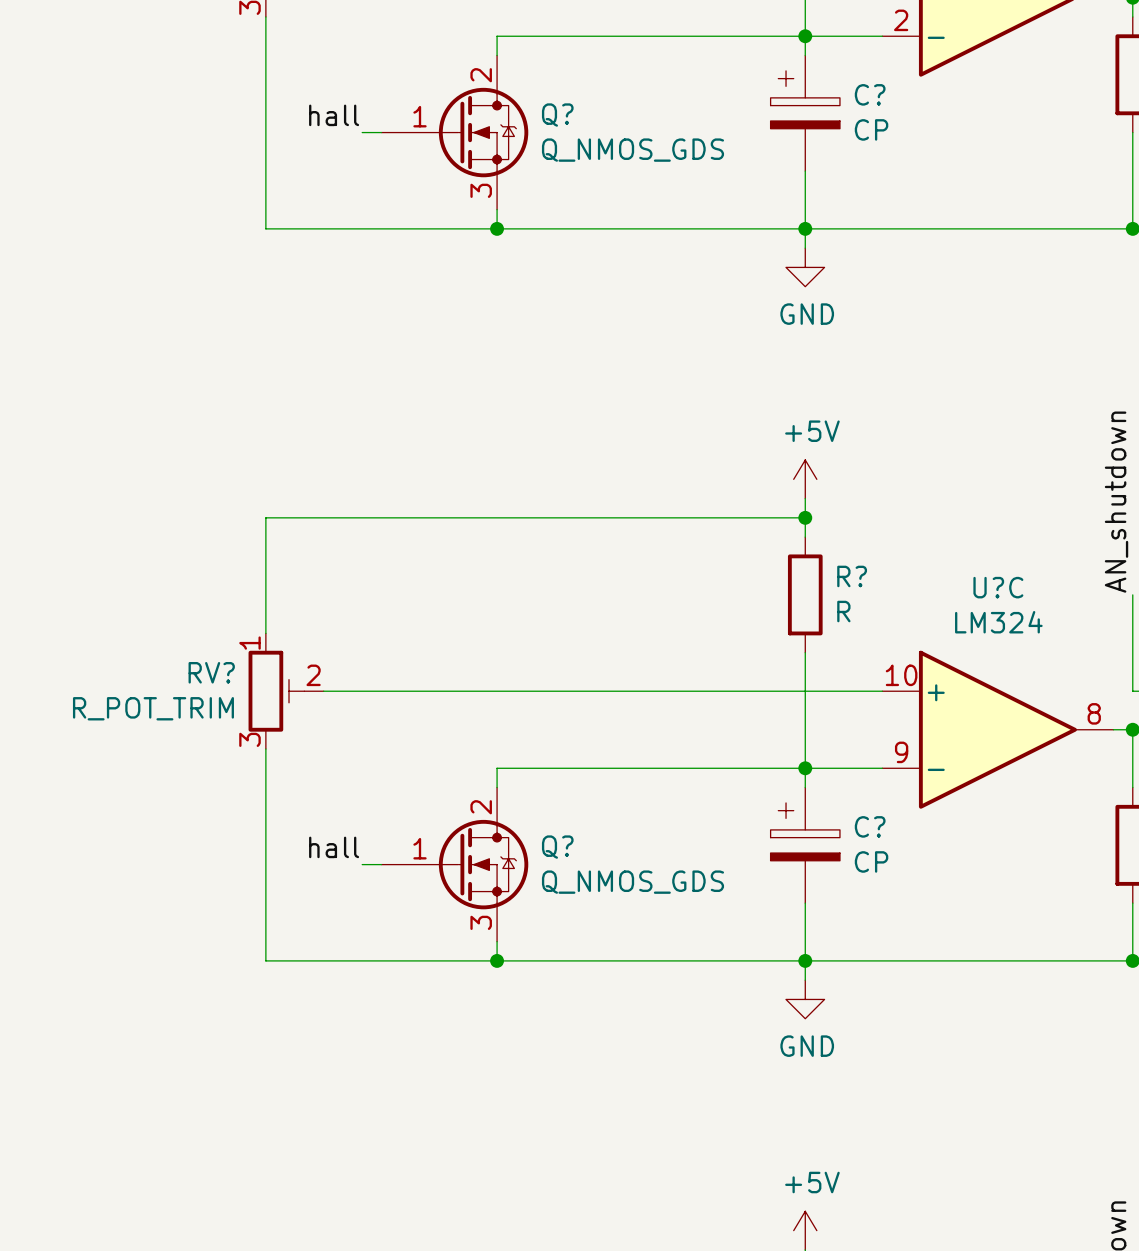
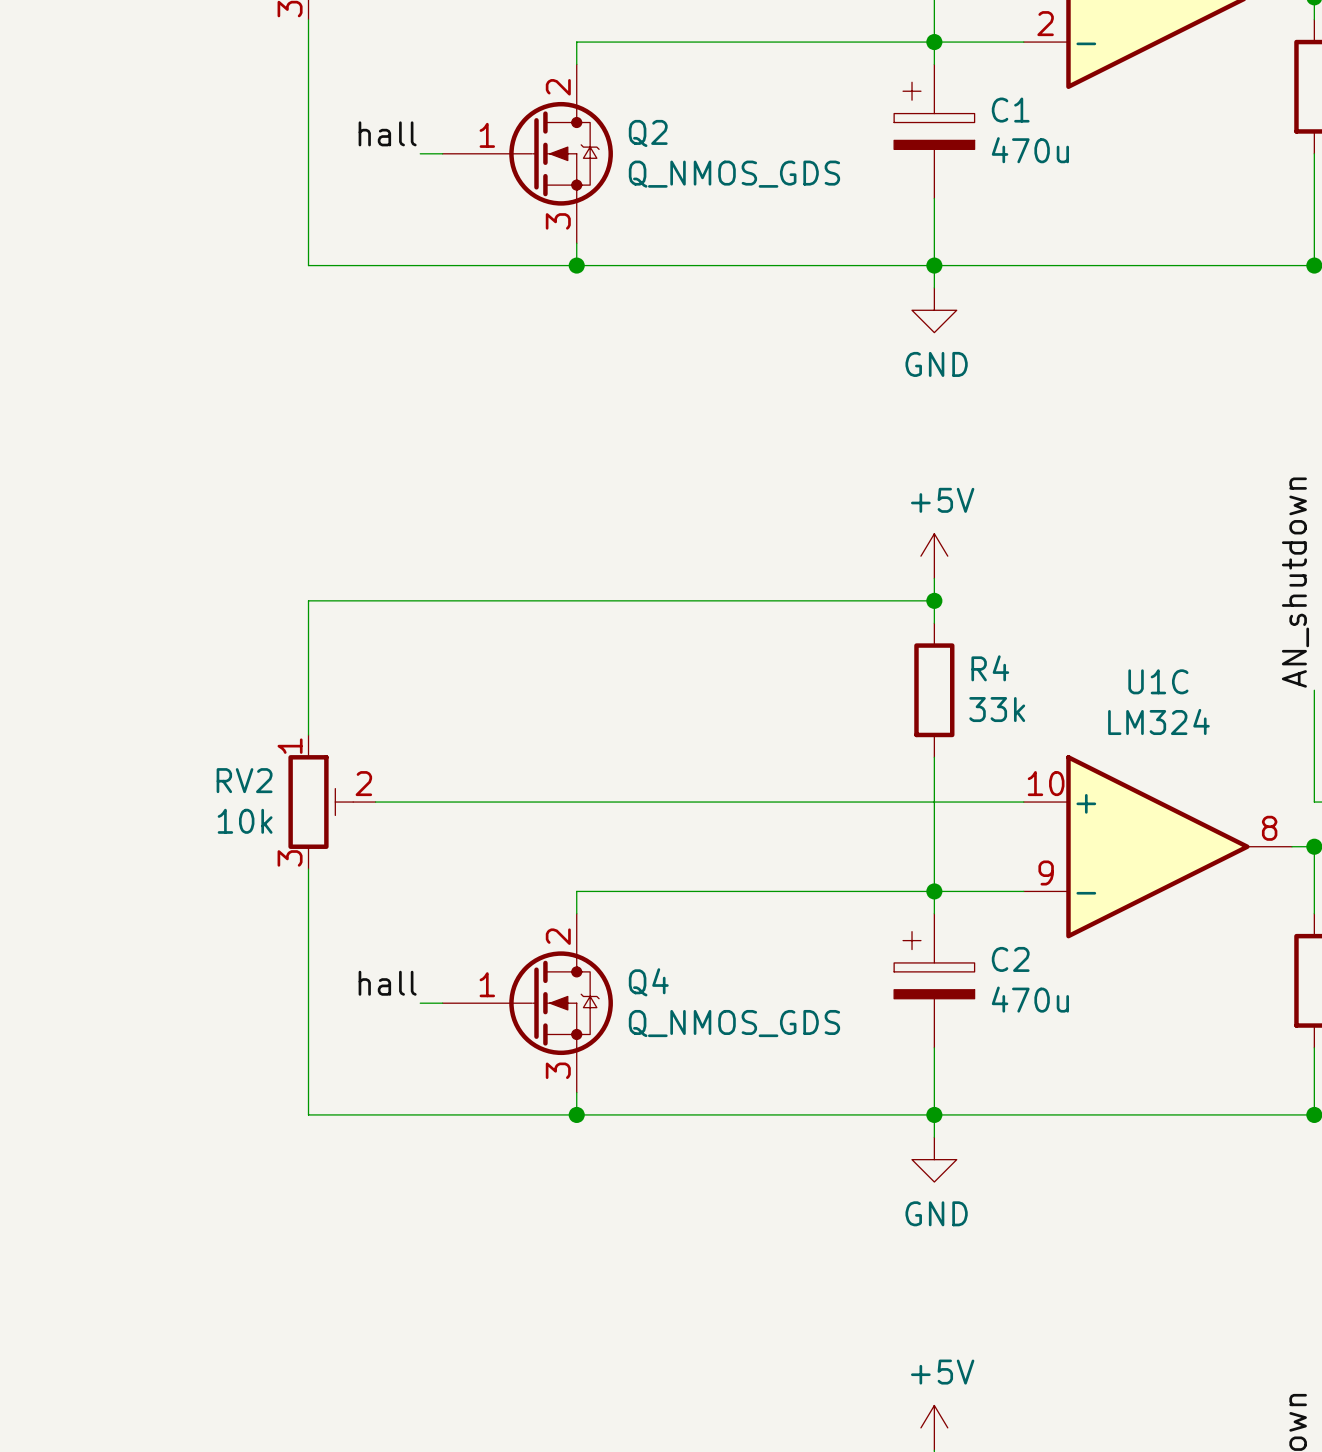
C? name: C? (870, 94) -> C1 (1010, 110)
Q? name: Q? (557, 115) -> Q2 (648, 133)
C? value: CP (871, 129) -> 470u (1030, 150)
R? name: R? (852, 576) -> R4 (990, 668)
U?C name: U?C (998, 587) -> U1C (1158, 681)
R? value: R (843, 611) -> 33k (997, 709)
RV? name: RV? (211, 672) -> RV2 (244, 780)
RV? value: R_POT_TRIM (153, 708) -> 10k (245, 821)
C? name: C? (870, 826) -> C2 (1010, 959)
Q? name: Q? (557, 847) -> Q4 (648, 982)
C? value: CP (871, 861) -> 470u (1030, 999)

